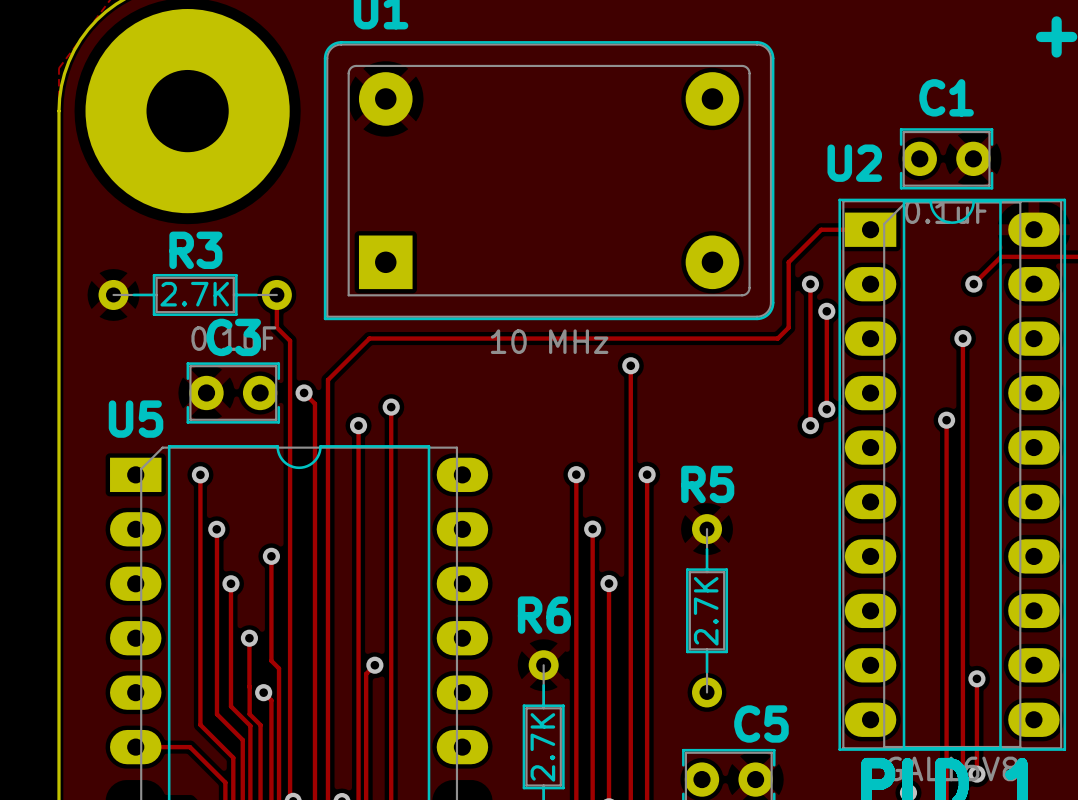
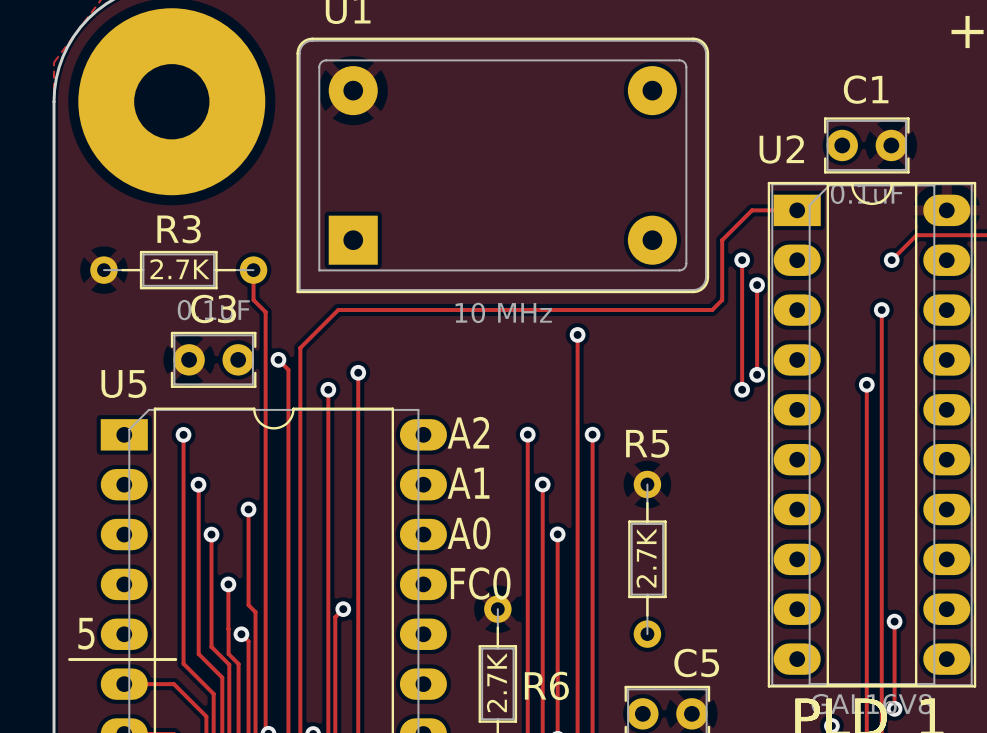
text: none -> A2 (468, 432)
text: none -> A1 (468, 483)
text: none -> A0 (469, 533)
R6 name position: R6 (544, 615) -> R6 (546, 685)
text: none -> FC0 (480, 583)
text: none -> 5 (86, 633)
line: none -> (69, 659) (175, 659)

